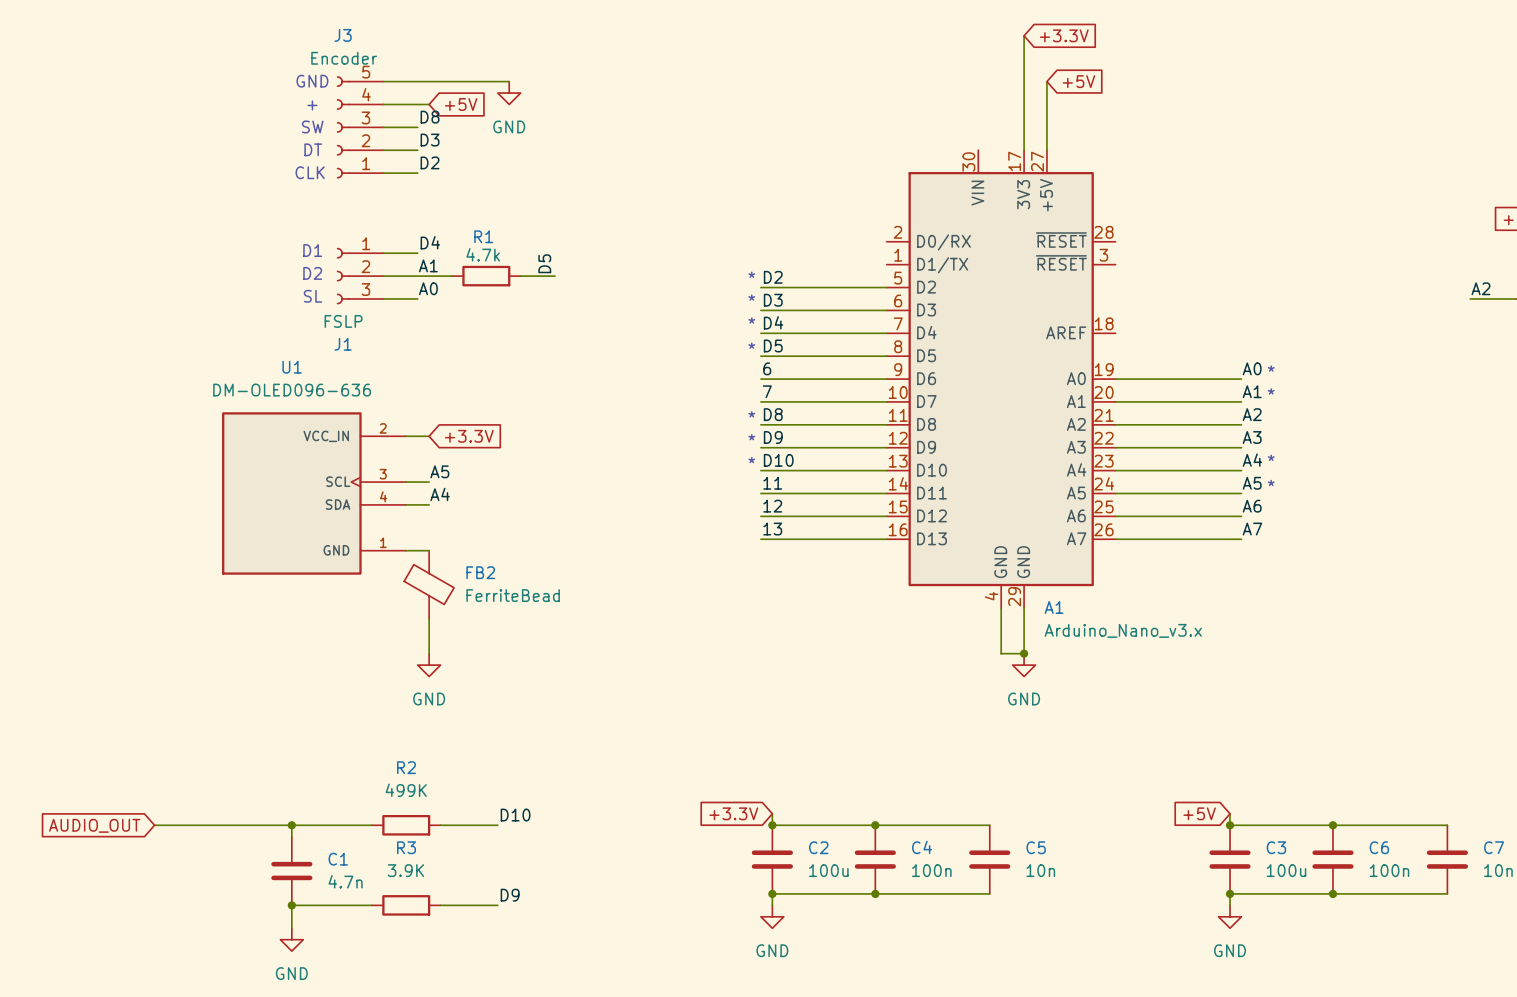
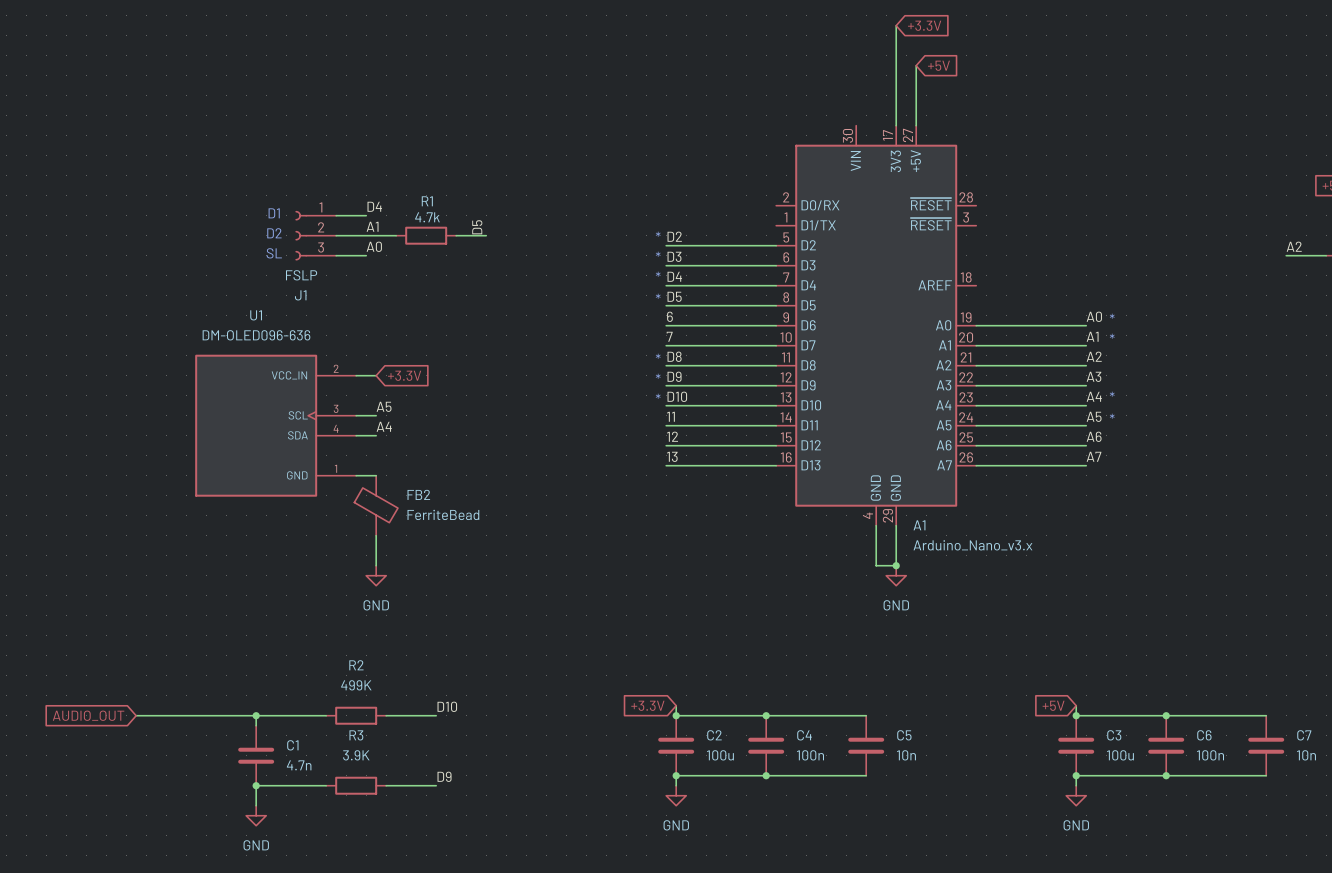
text: GND (312, 81) -> none
wire: (383, 81) (509, 81) -> none
power symbol: GND (509, 93) -> none
wire: (383, 104) (429, 104) -> none
global label: +5V (461, 104) -> none
text: + (312, 105) -> none
label: D8 (430, 117) -> none
text: SW (312, 126) -> none
J3: Encoder (360, 127) -> none
wire: (383, 127) (417, 127) -> none
label: D3 (430, 140) -> none
text: DT (313, 149) -> none
wire: (383, 150) (417, 150) -> none
label: D2 (430, 162) -> none
text: CLK (310, 172) -> none
wire: (383, 173) (417, 173) -> none

